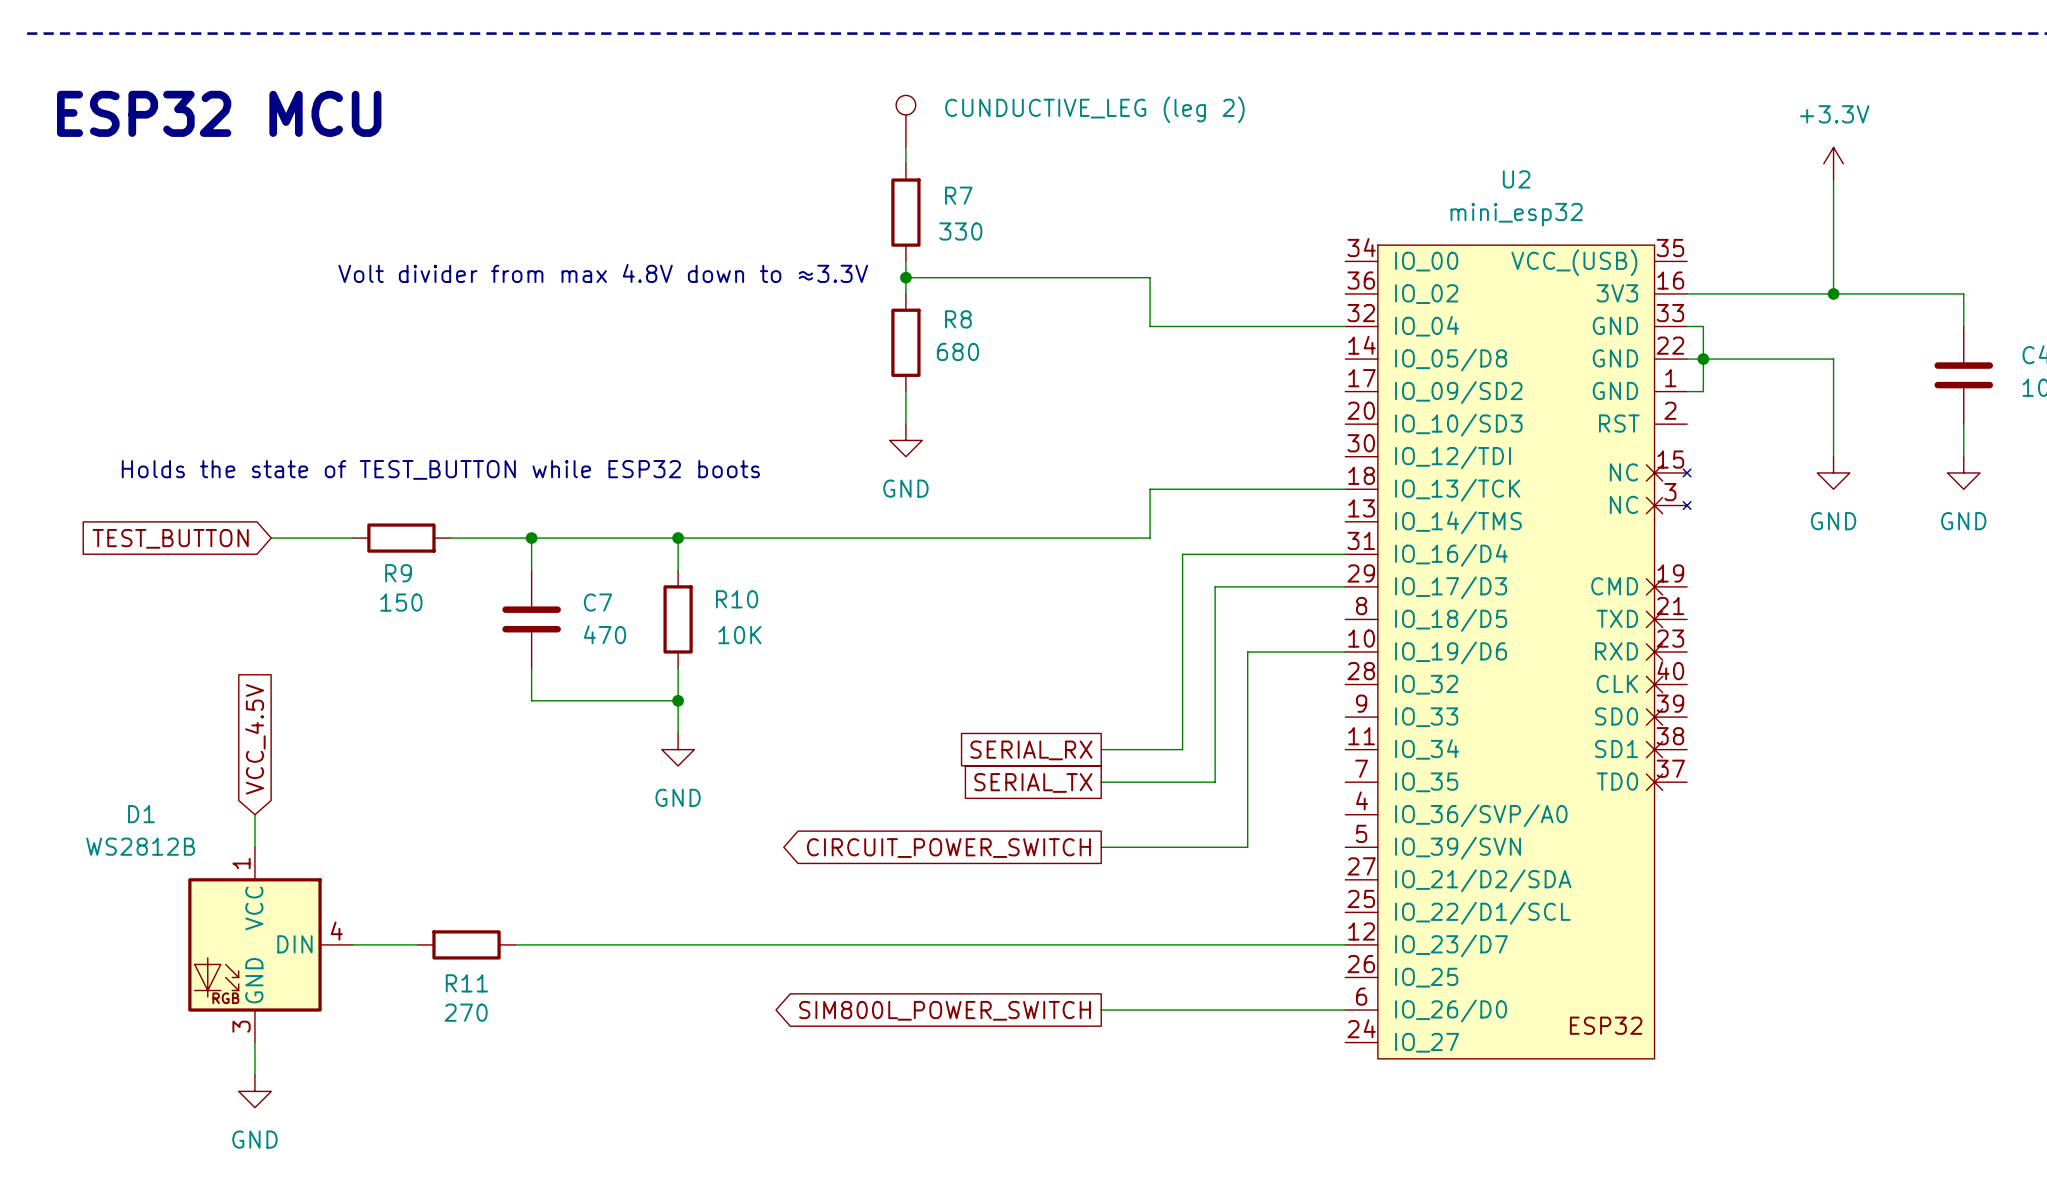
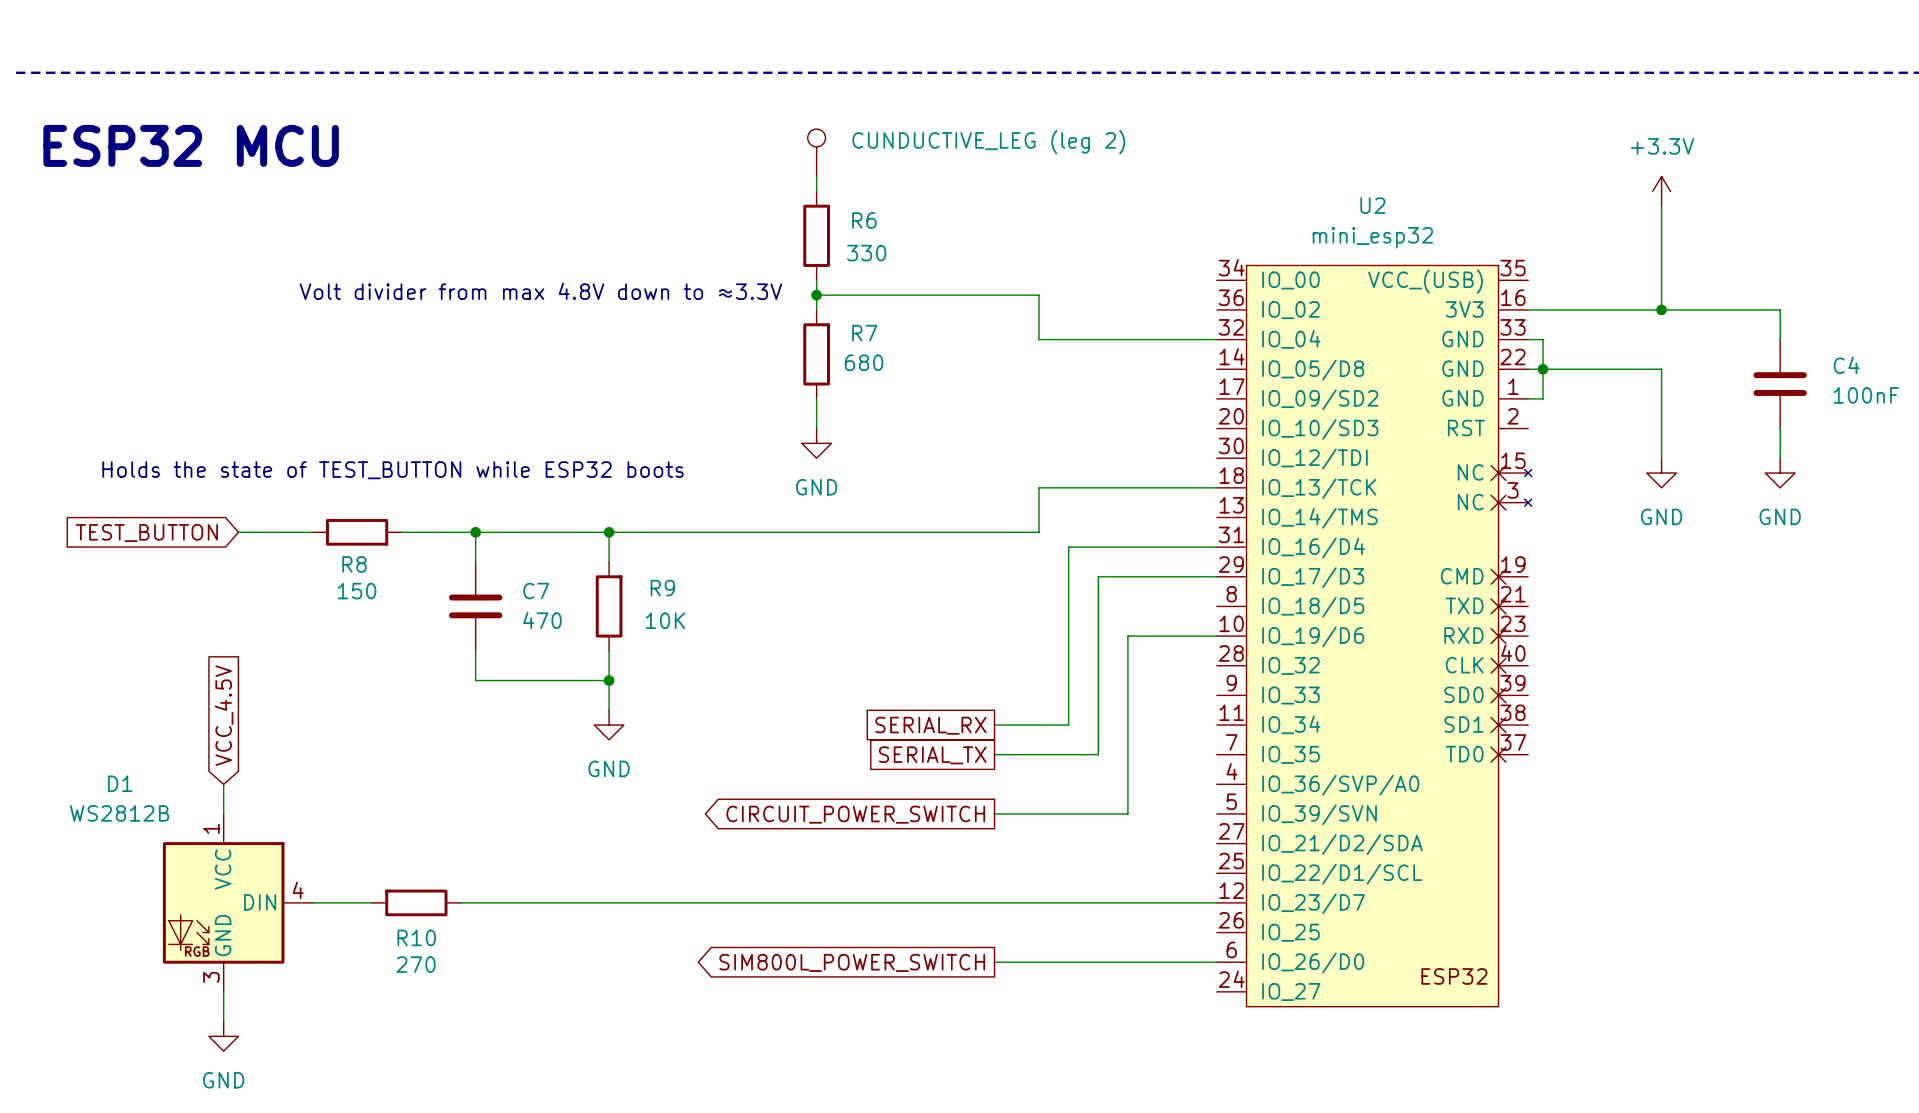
R7 name: R7 (958, 195) -> R6 (864, 220)
R8 name: R8 (958, 319) -> R7 (864, 333)
R9 name: R9 (398, 573) -> R8 (354, 564)
R10 name: R10 (737, 599) -> R9 (662, 588)
R11 name: R11 (466, 983) -> R10 (416, 937)

